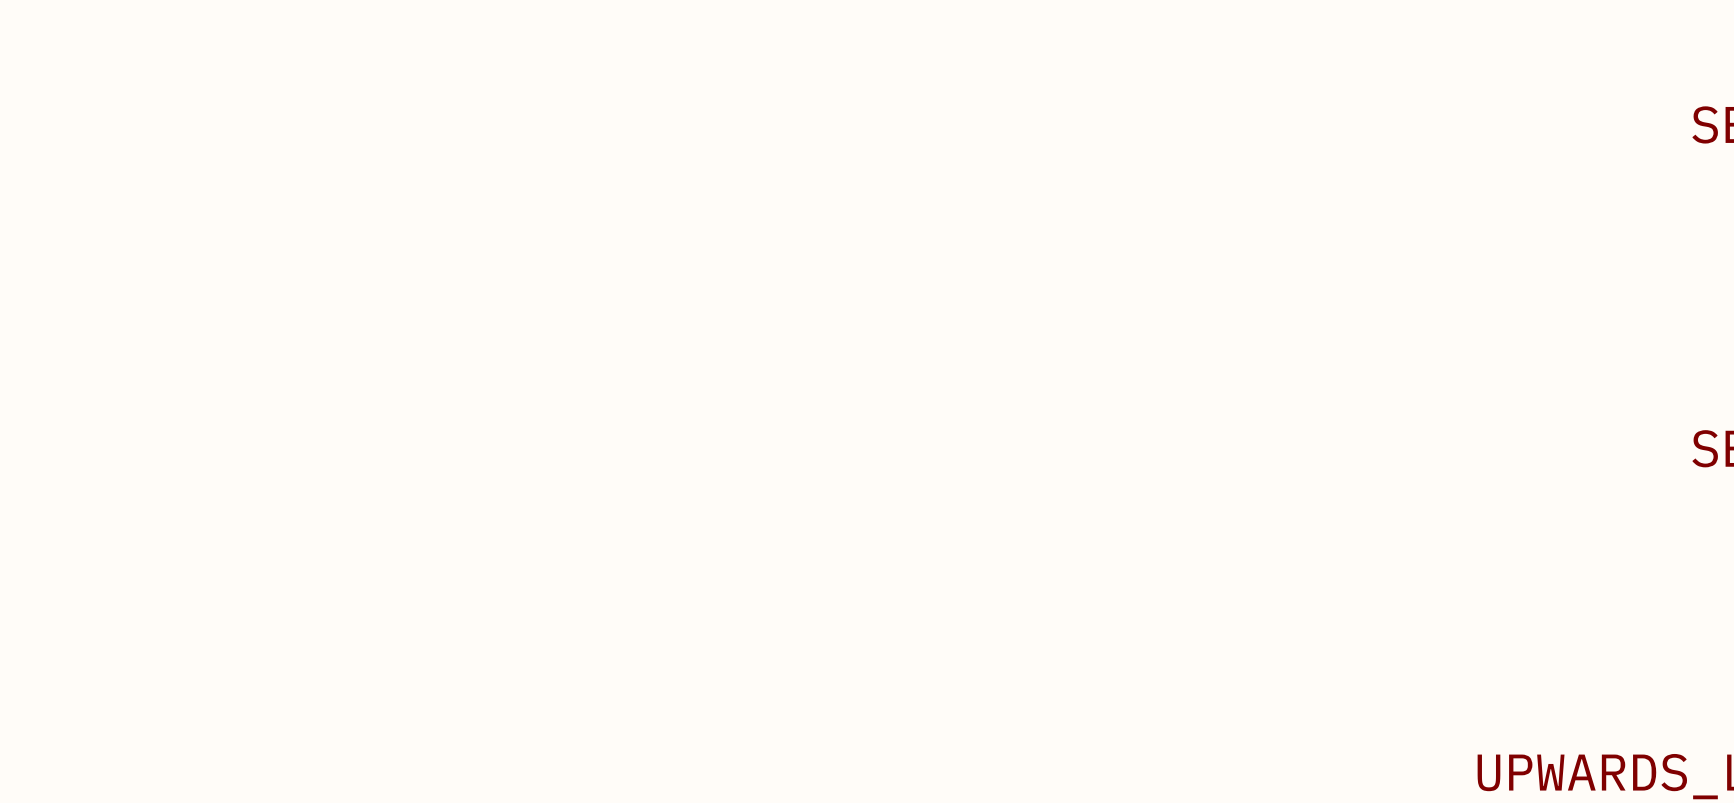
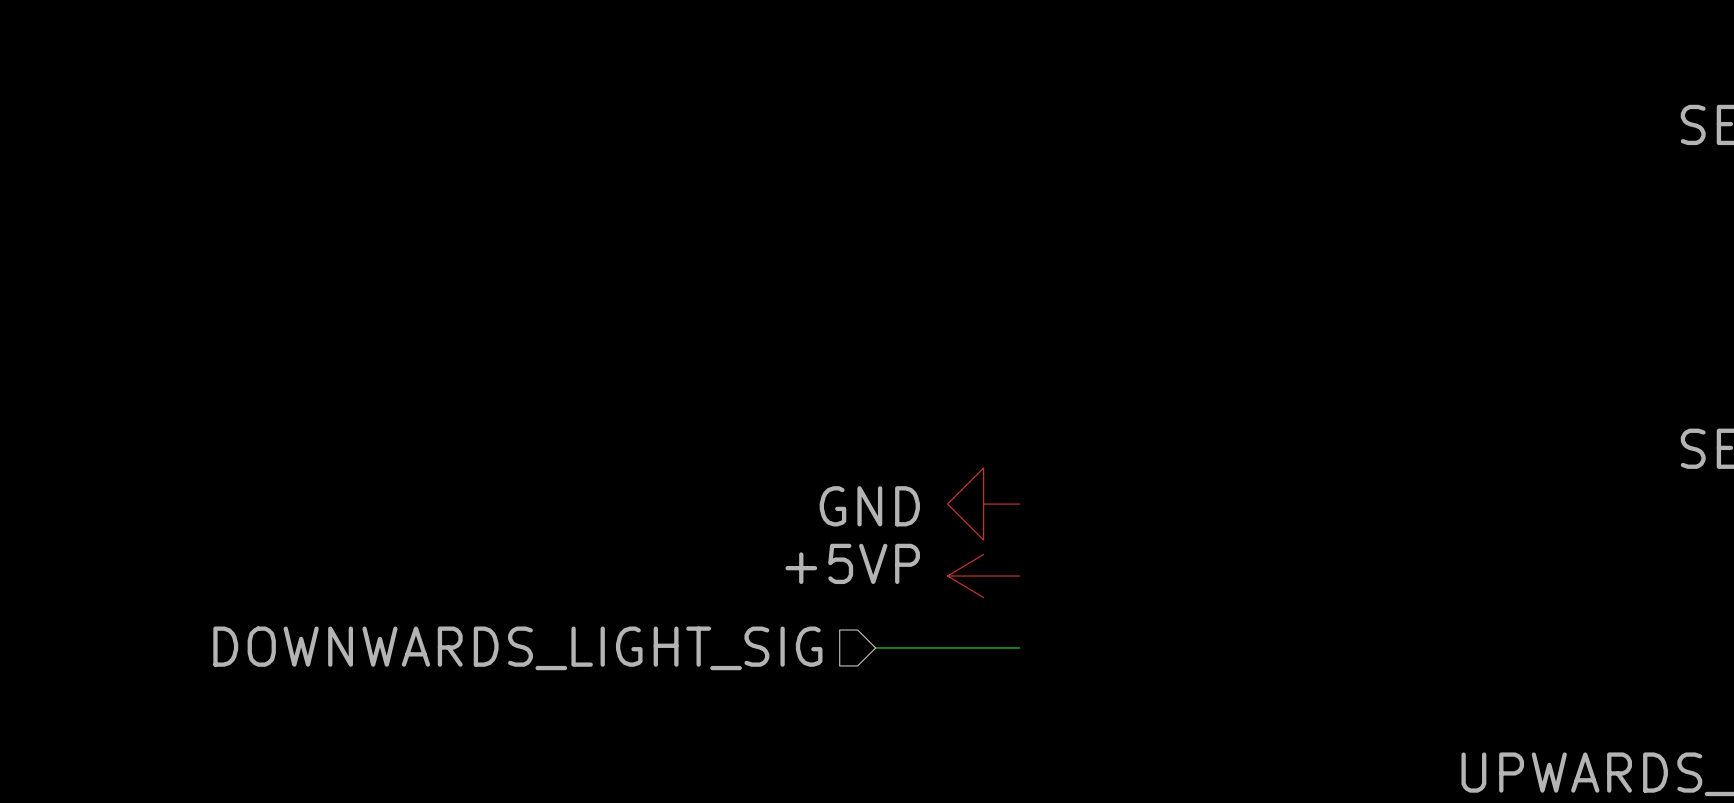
power symbol: none -> GND (983, 504)
power symbol: none -> +5VP (983, 576)
wire: none -> (875, 647) (1019, 647)
hierarchical label: none -> DOWNWARDS_LIGHT_SIG (517, 648)

